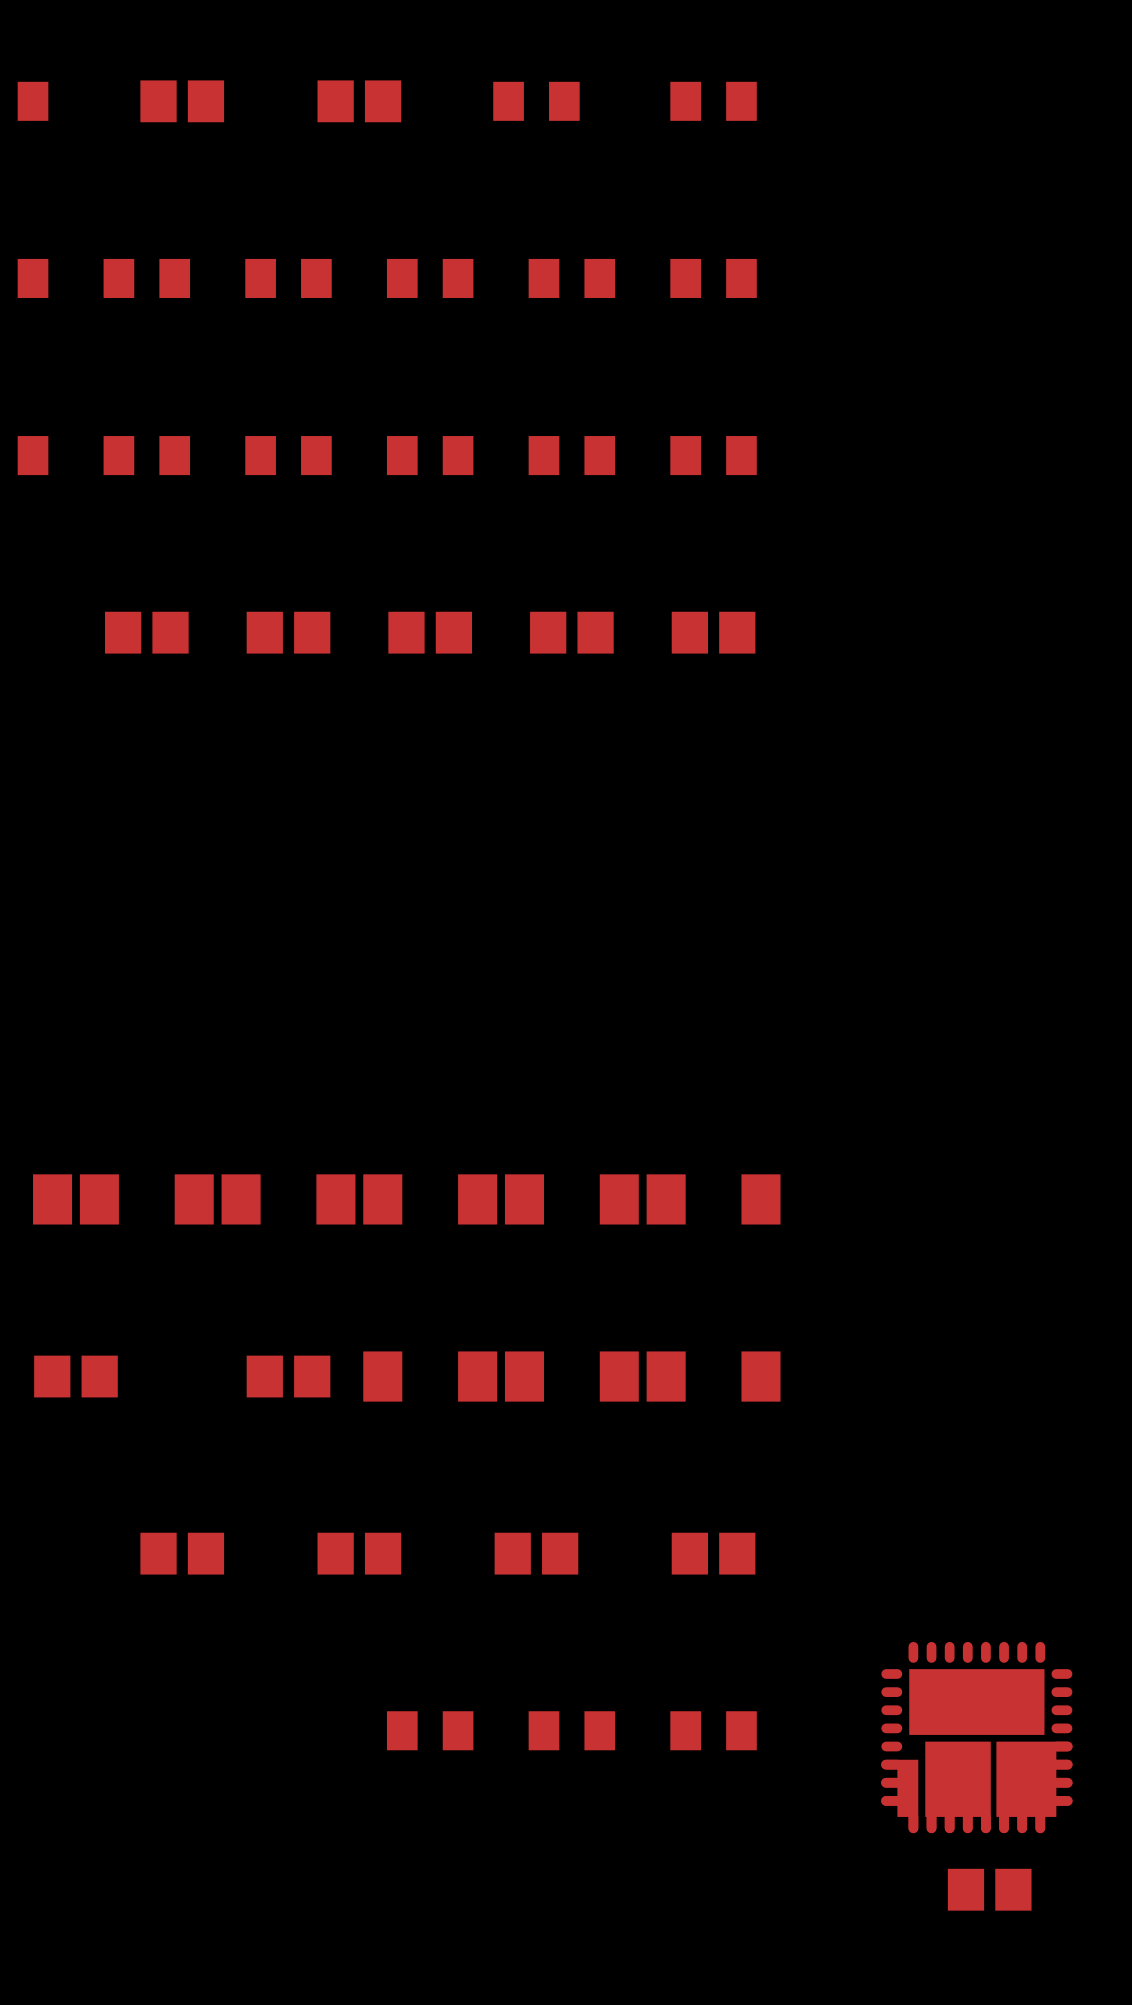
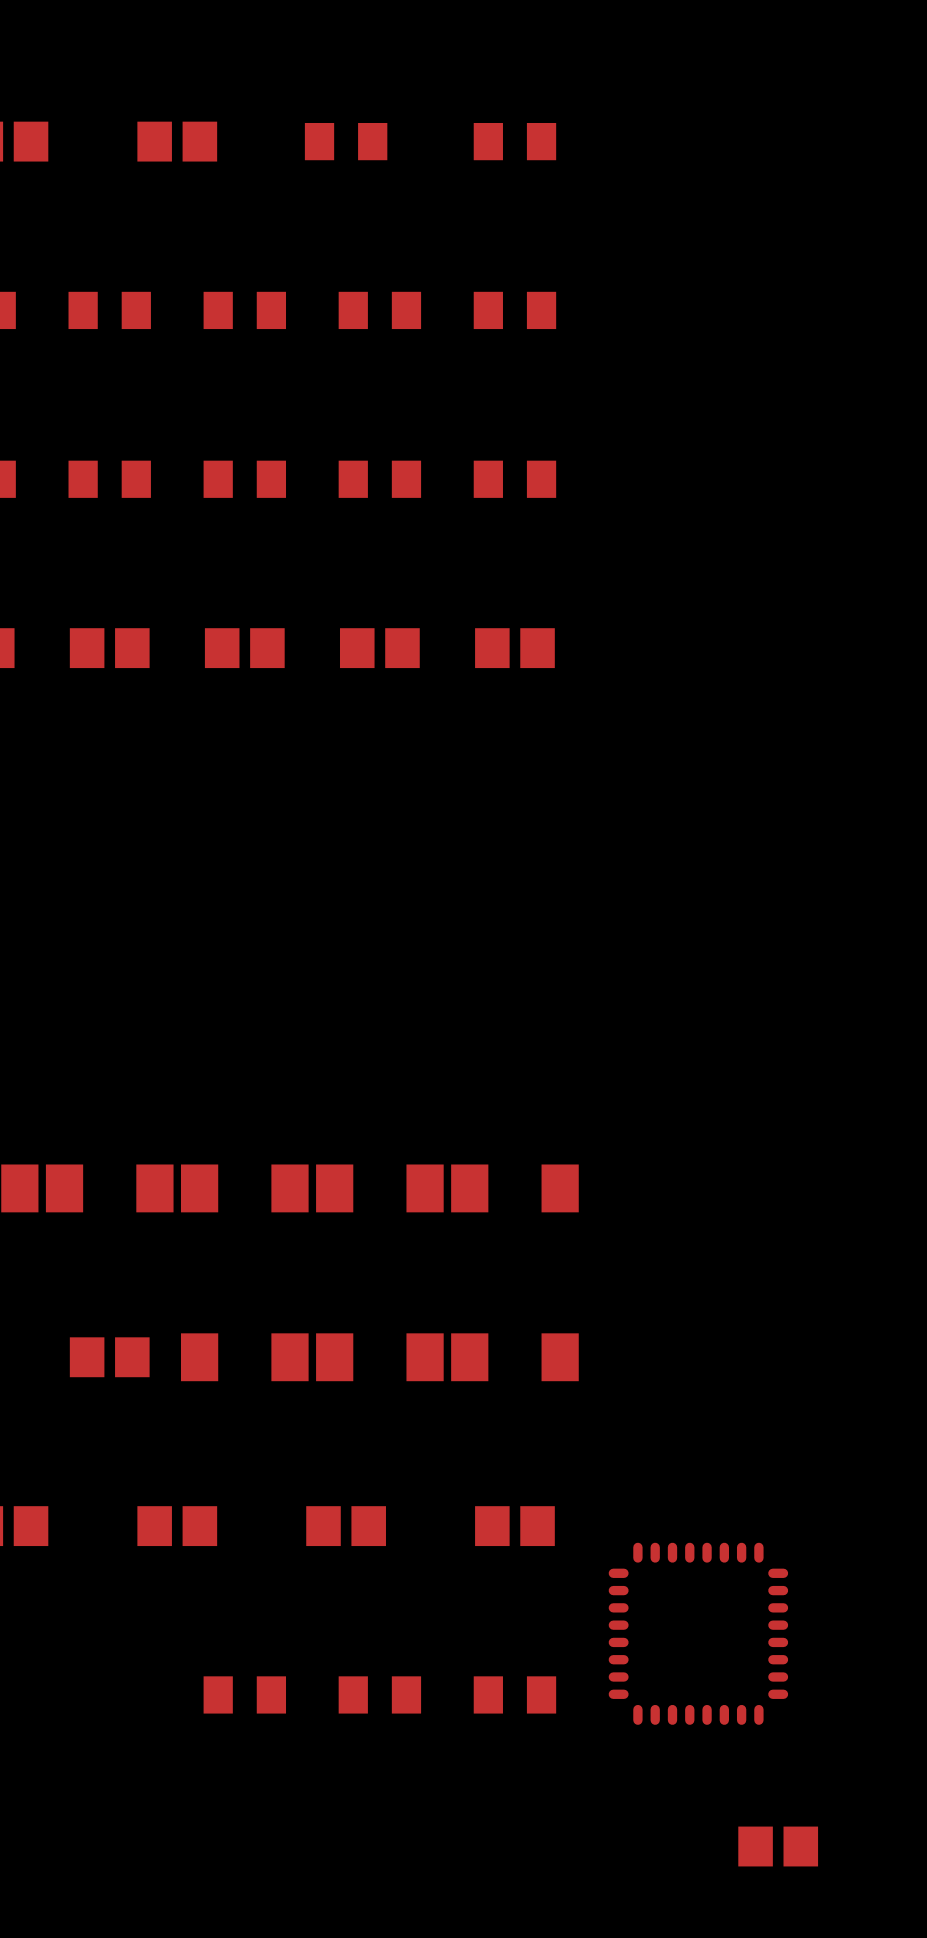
part: none -> (698, 1633)
part: (976, 1737) -> none

